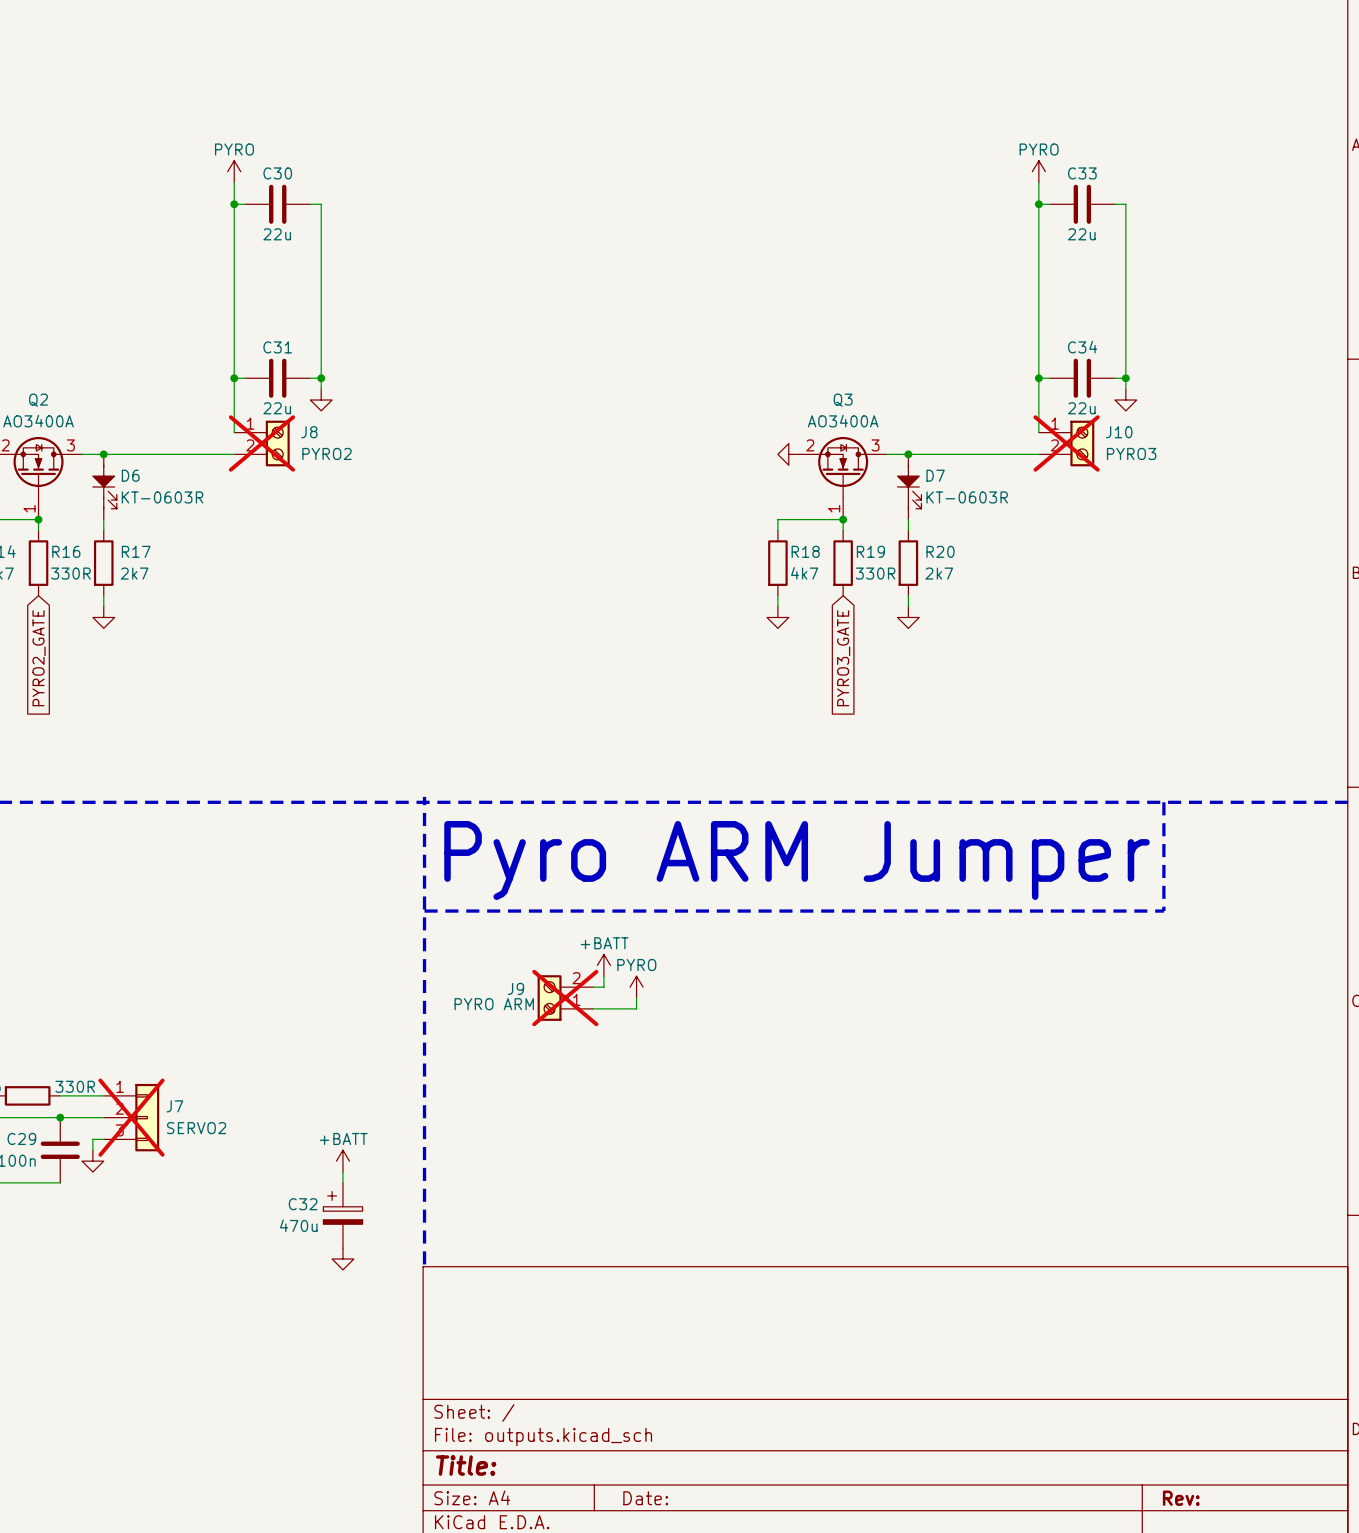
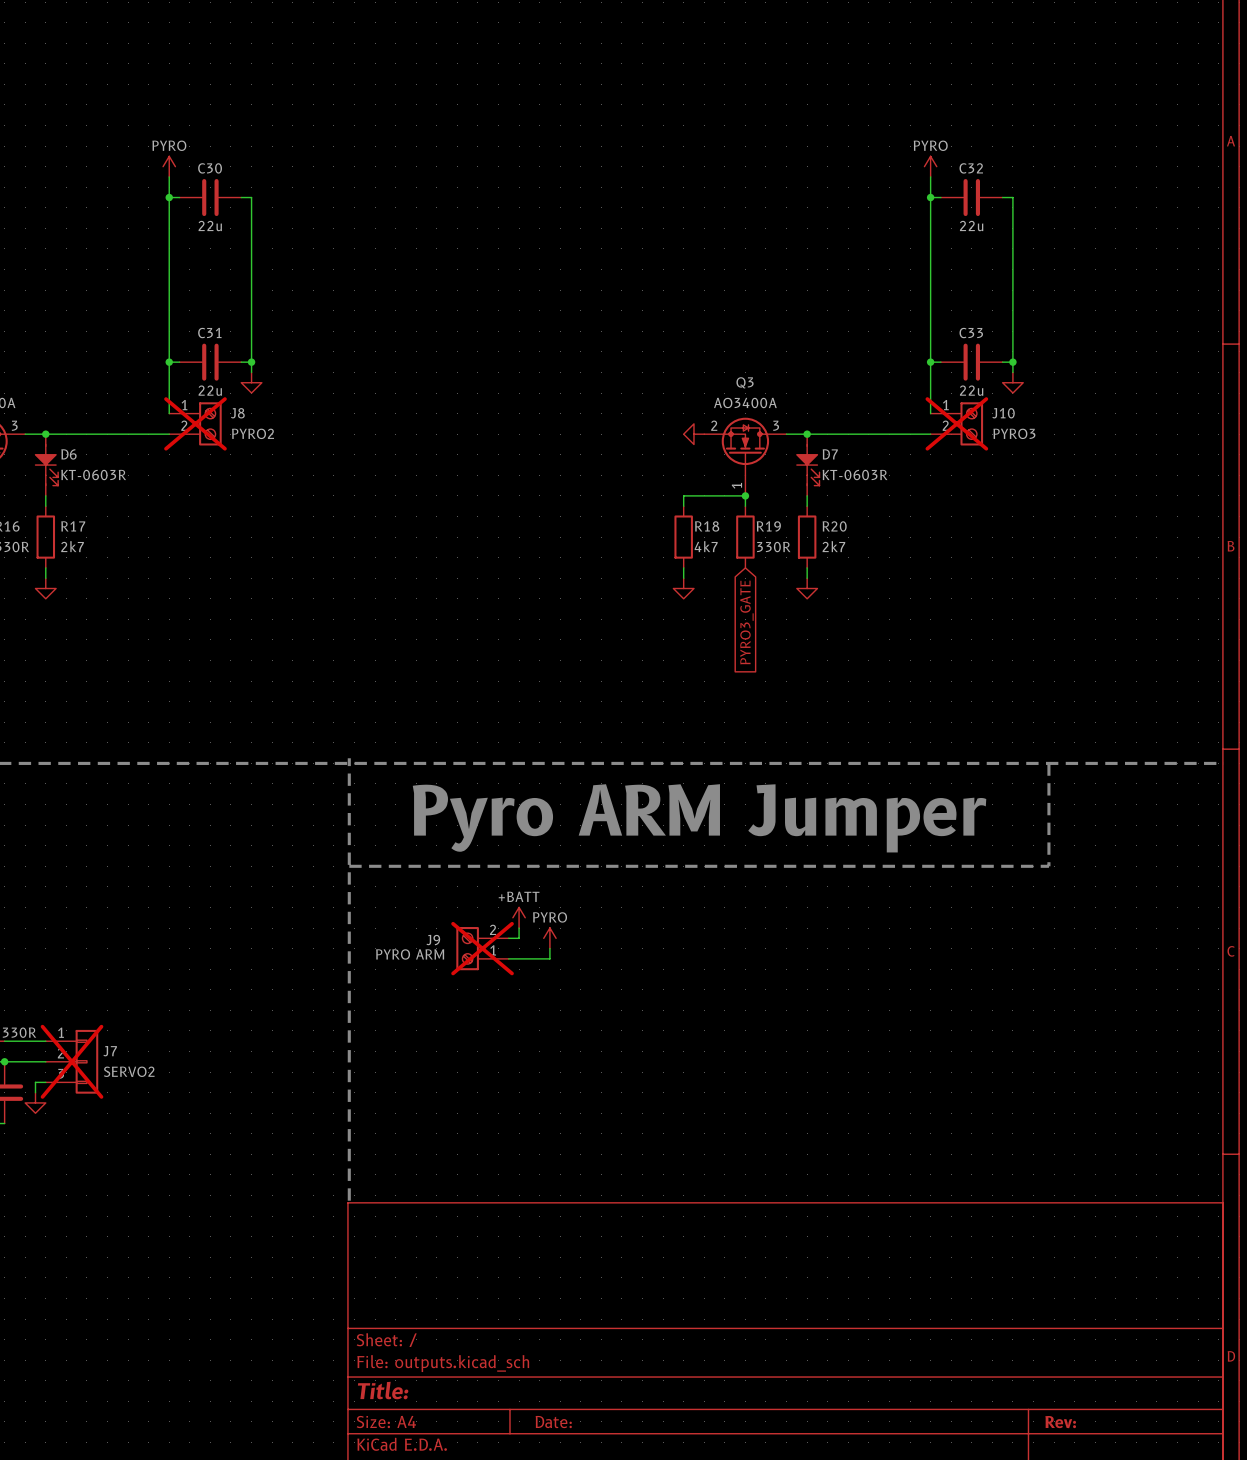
C33 name: C33 (1082, 173) -> C32 (971, 168)
C34 name: C34 (1082, 347) -> C33 (971, 333)
power symbol: +BATT (342, 1161) -> none
wire: (342, 1172) (342, 1182) -> none
C32: 470u (342, 1215) -> none
power symbol: (342, 1258) -> none

